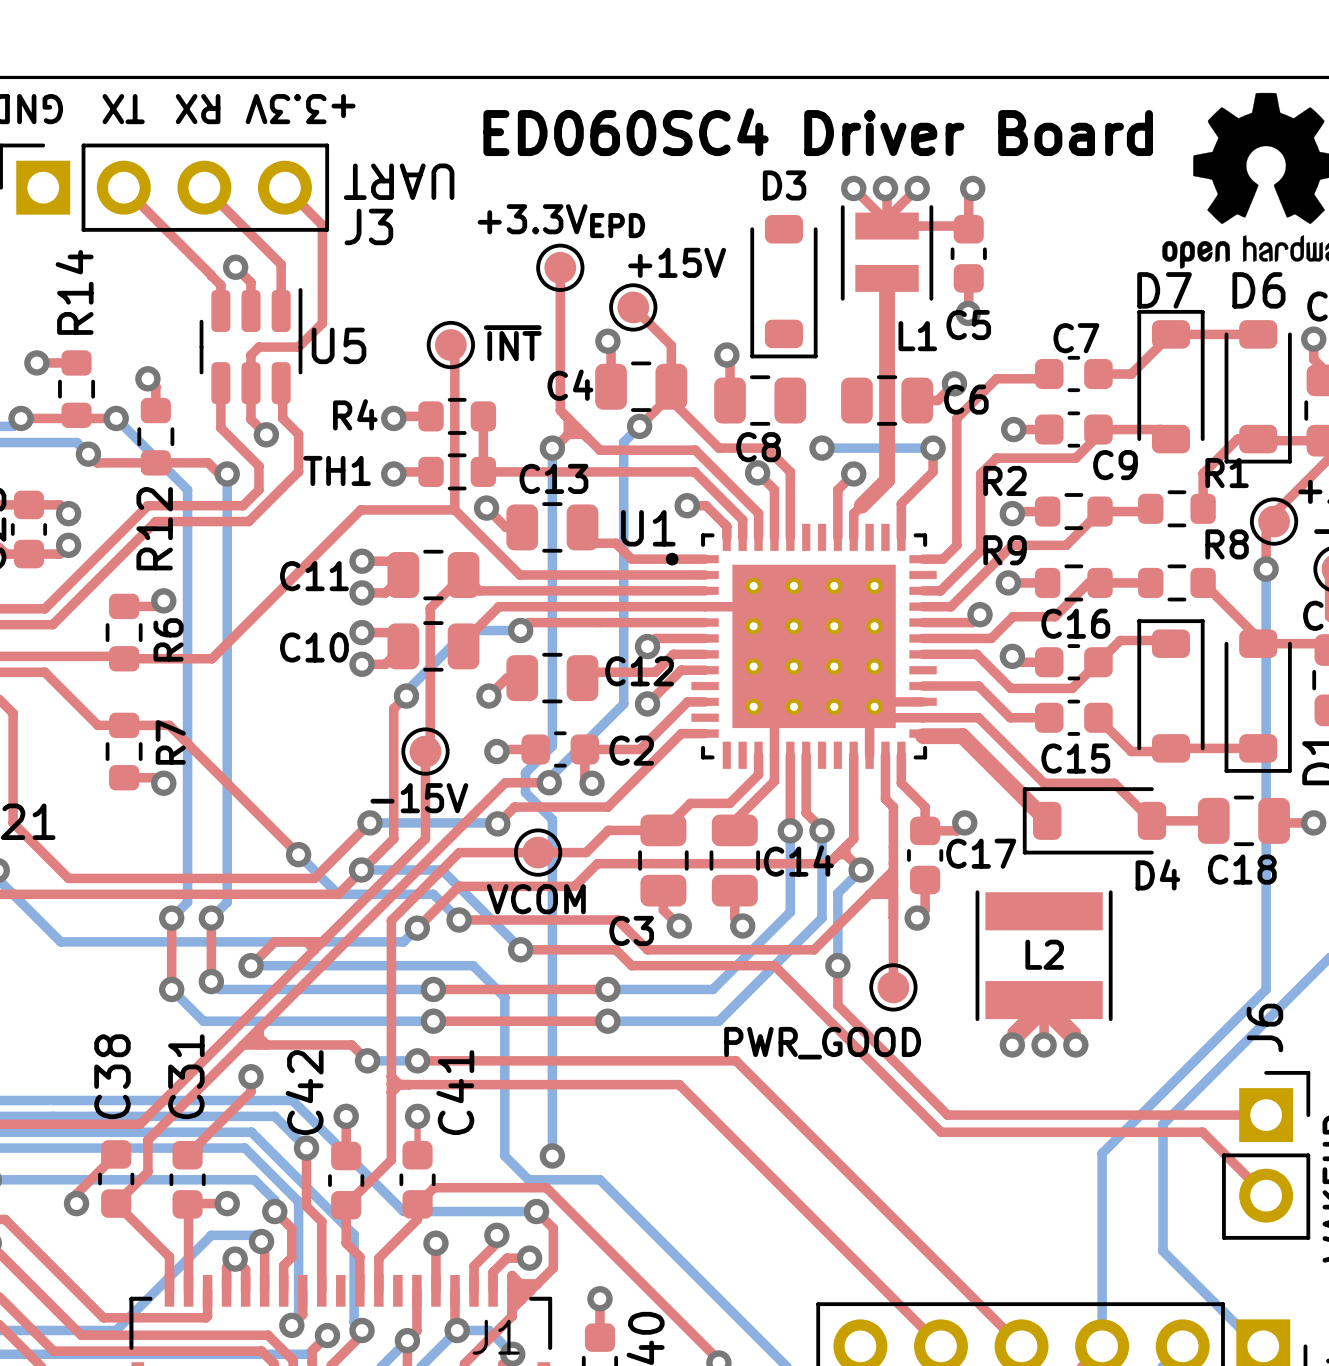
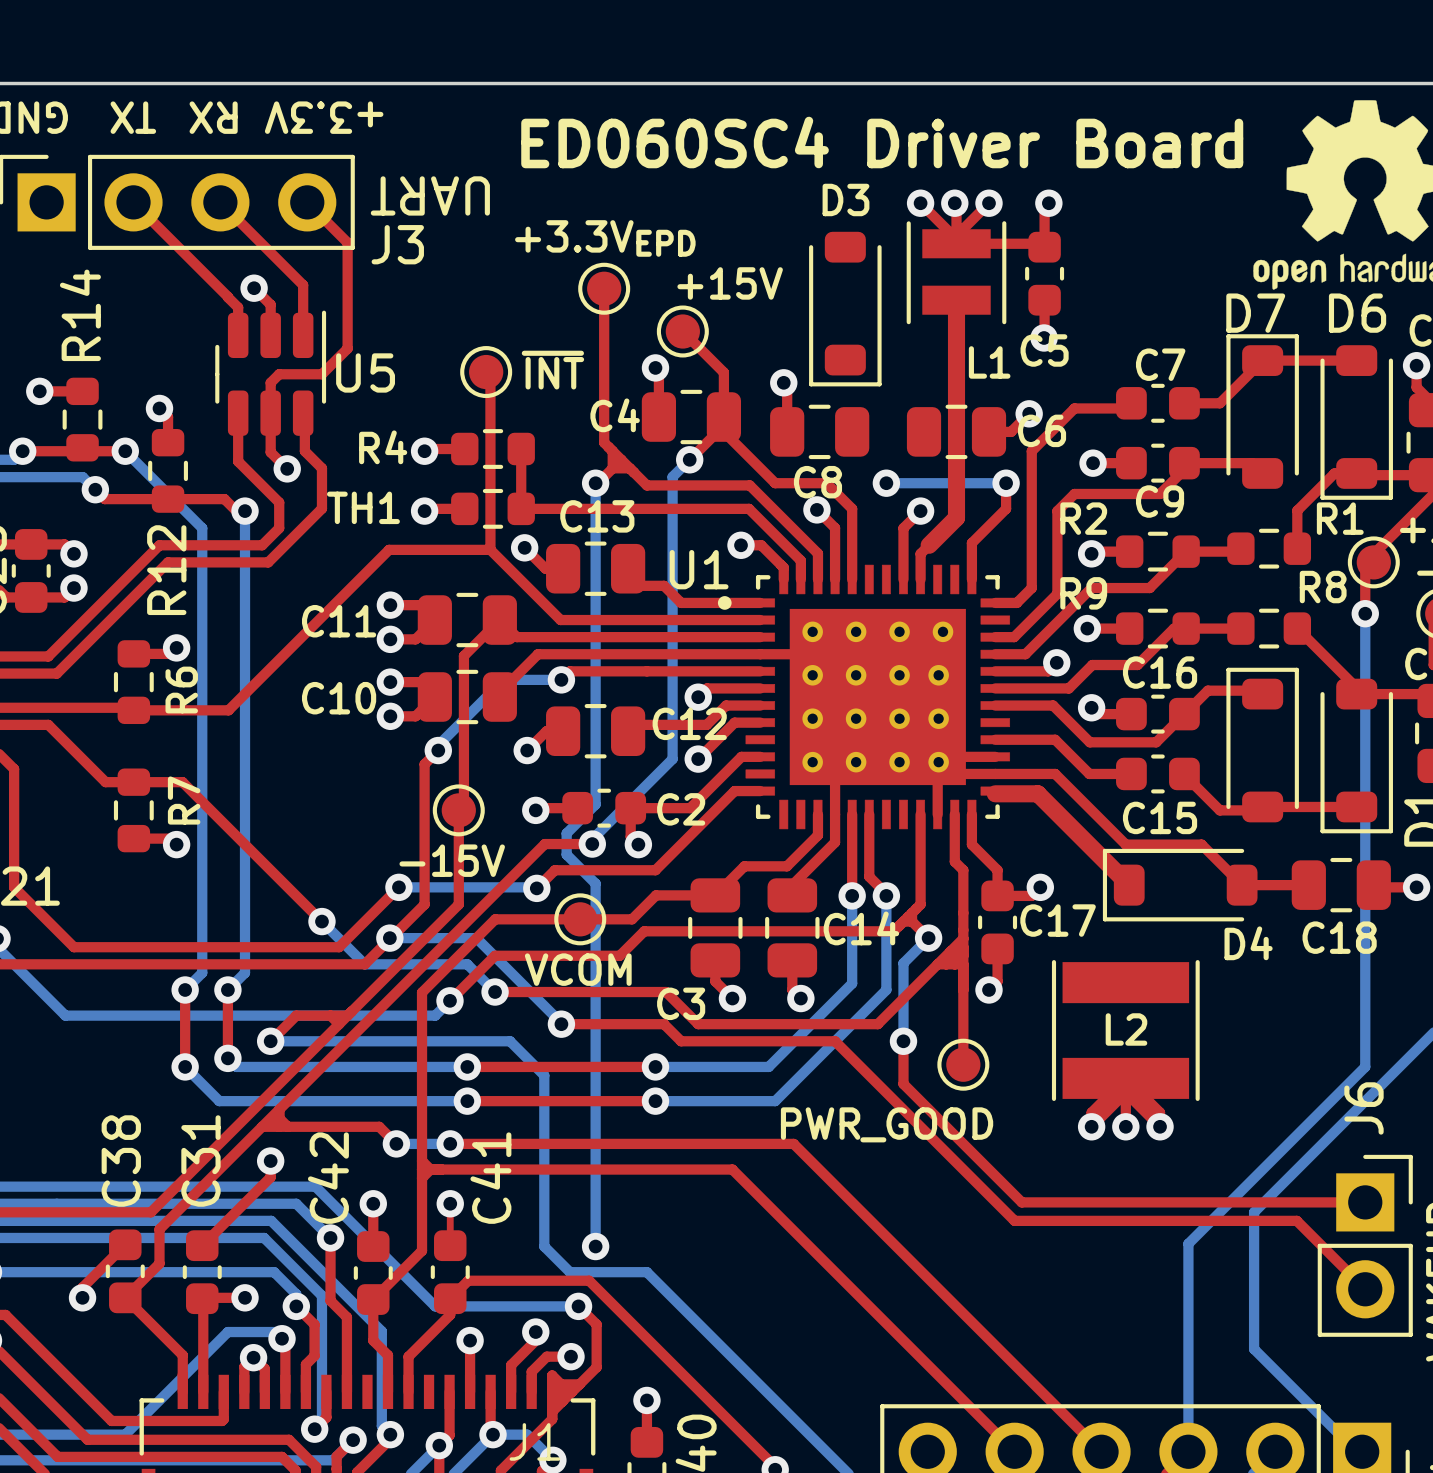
C9 name position: C9 (1115, 465) -> C9 (1160, 501)
R1 name position: R1 (1227, 473) -> R1 (1340, 518)
U1 footprint: [665, 523, 937, 769] -> [717, 564, 1011, 830]

